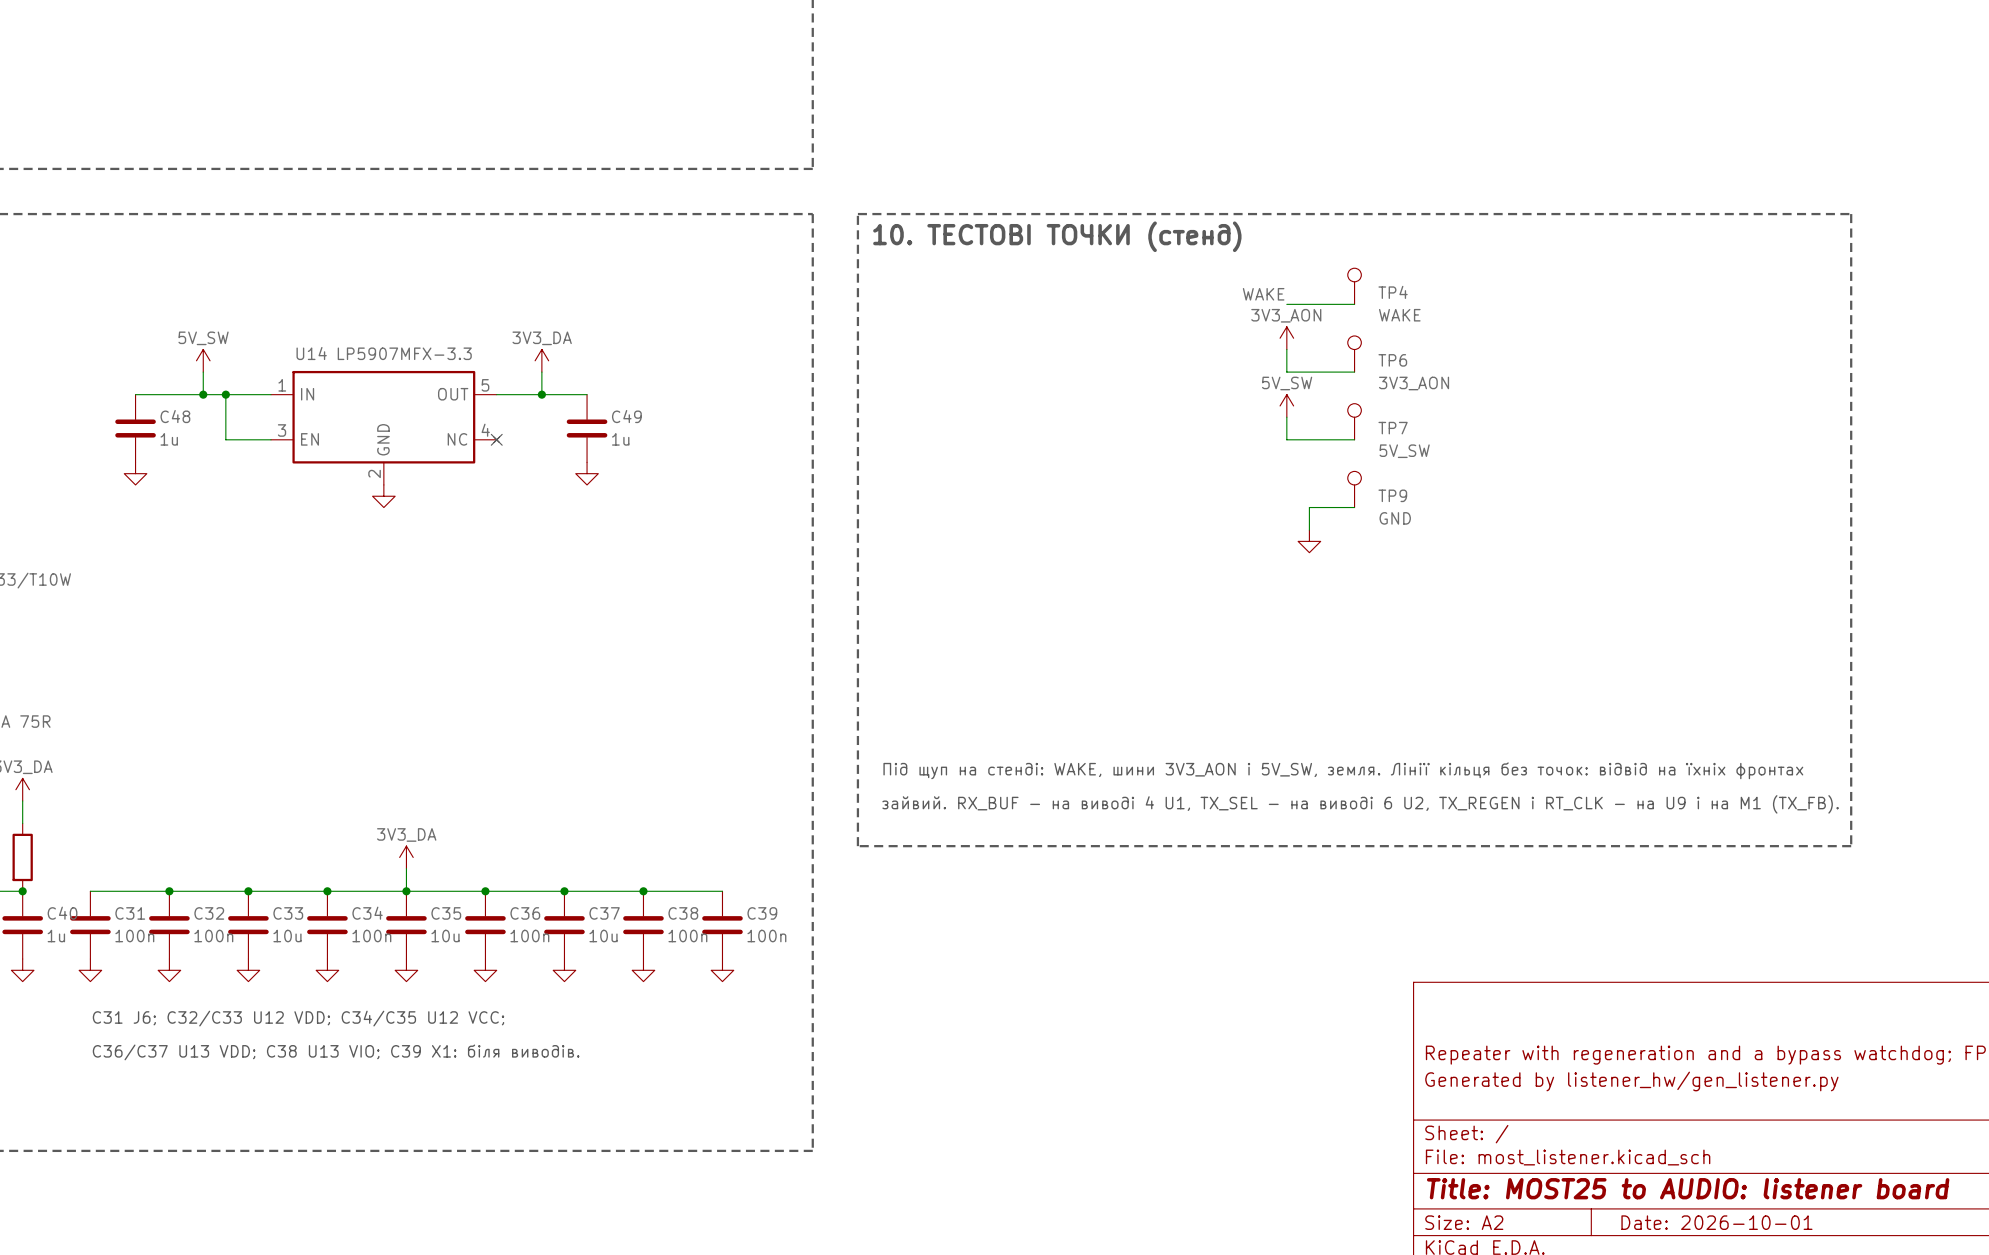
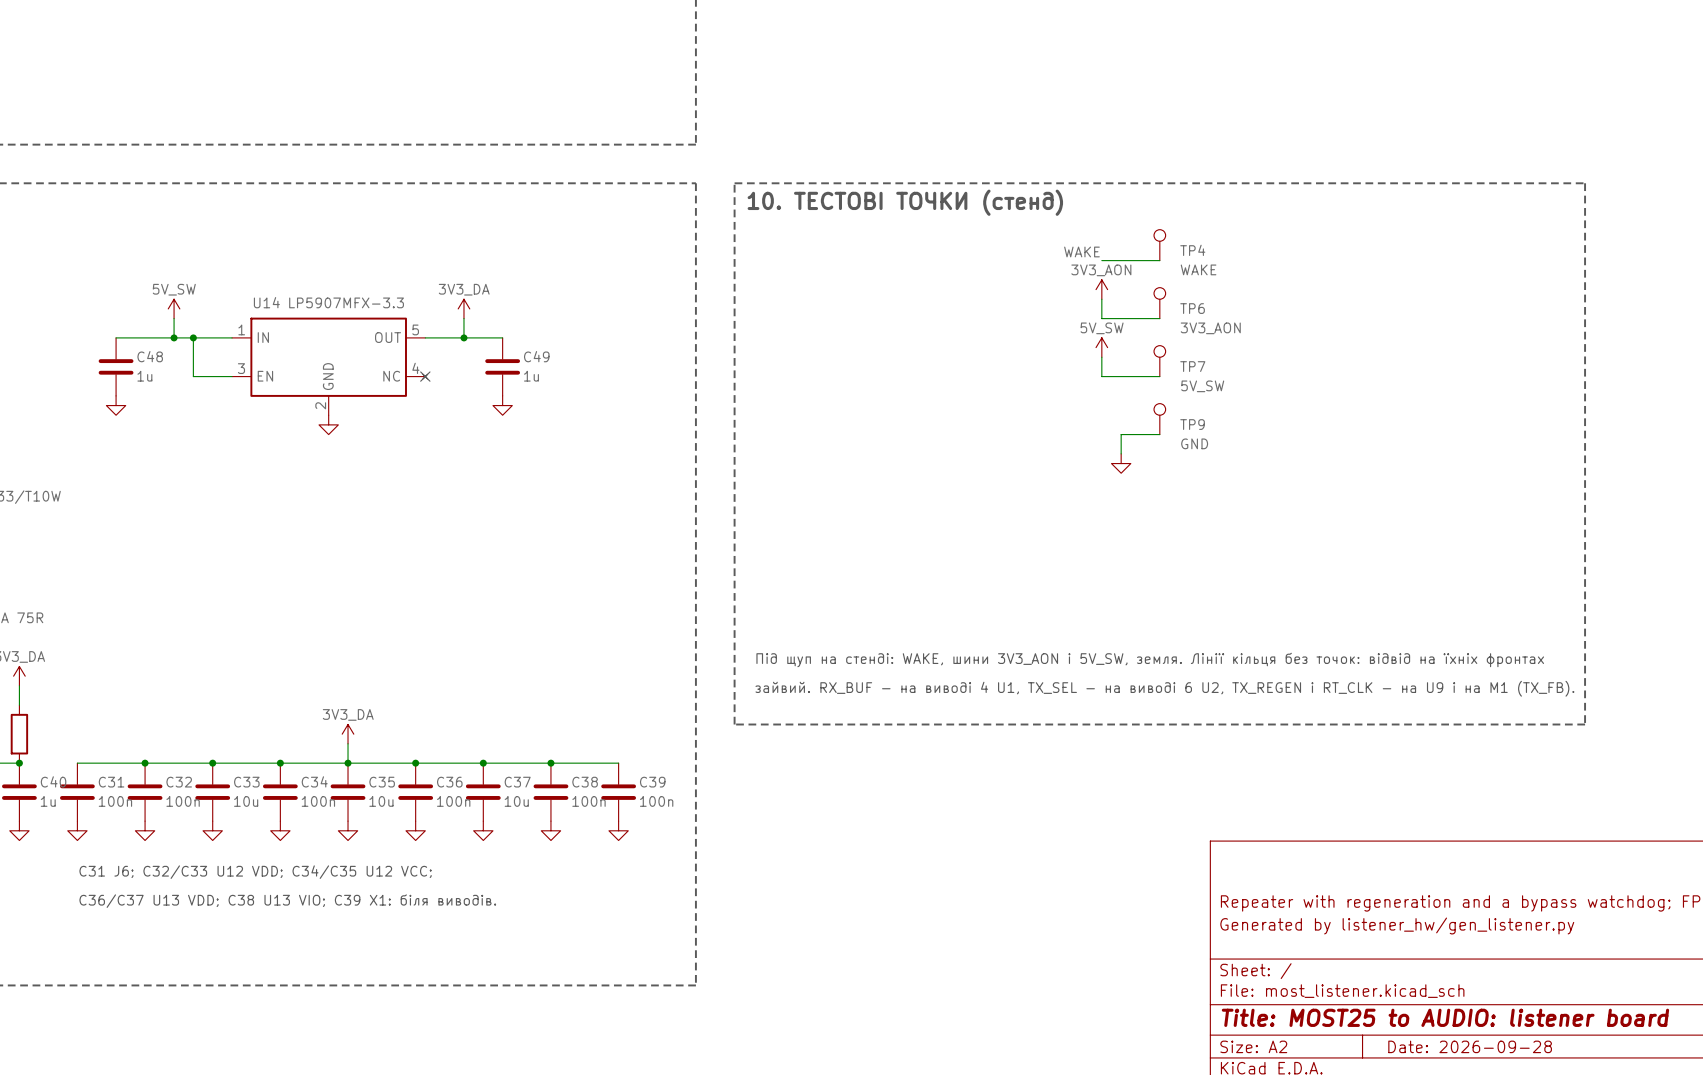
title block: Date: 2026-10-01 (1716, 1222) -> Date: 2026-09-28 (1470, 1046)

